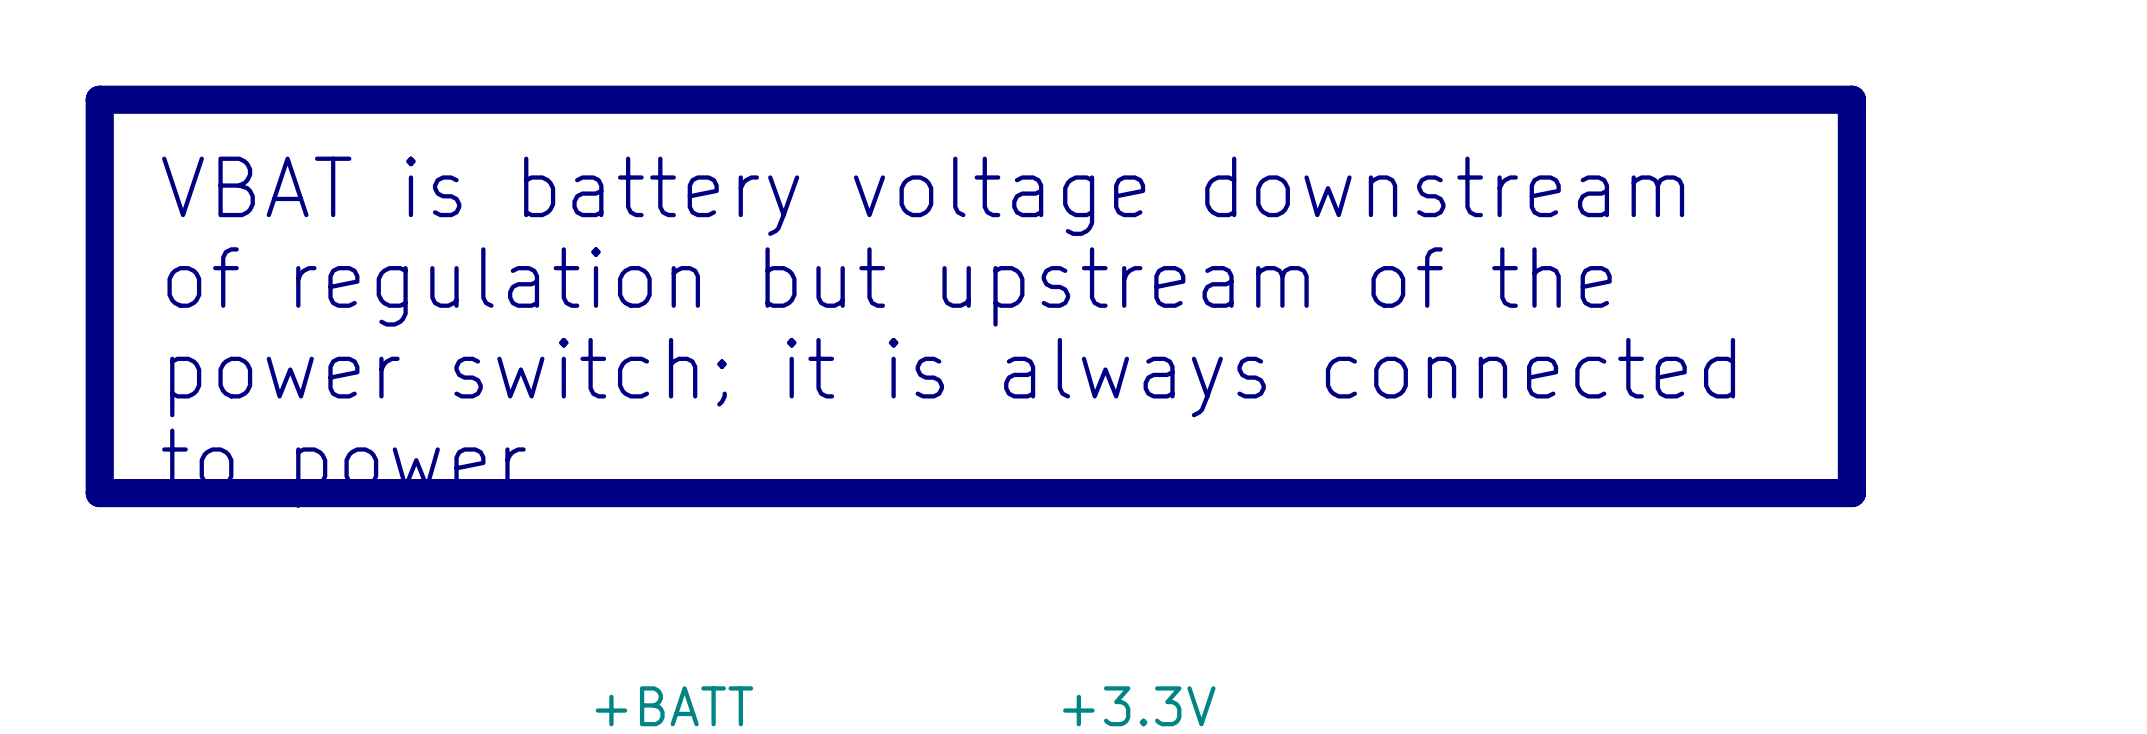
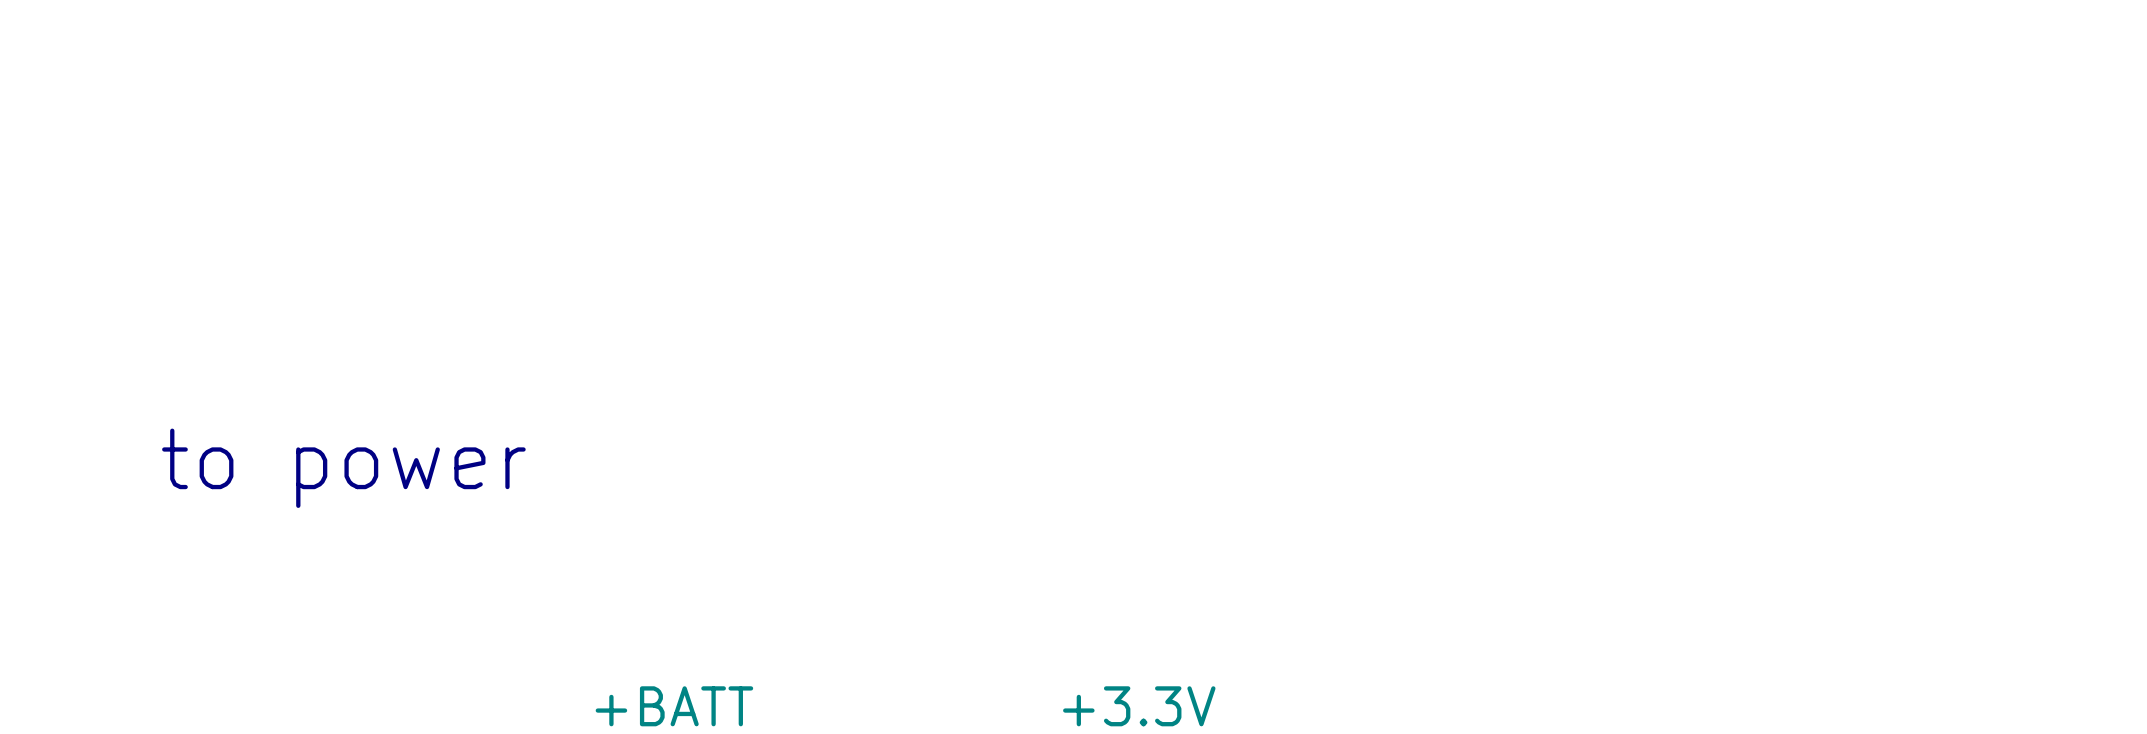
line: (99, 99) (1851, 99) (1851, 493) (99, 493) (99, 99) -> none
text: VBAT is battery voltage downstream (923, 196) -> none
text: of regulation but upstream of the (889, 286) -> none
text: power switch; it is always connected (952, 377) -> none

